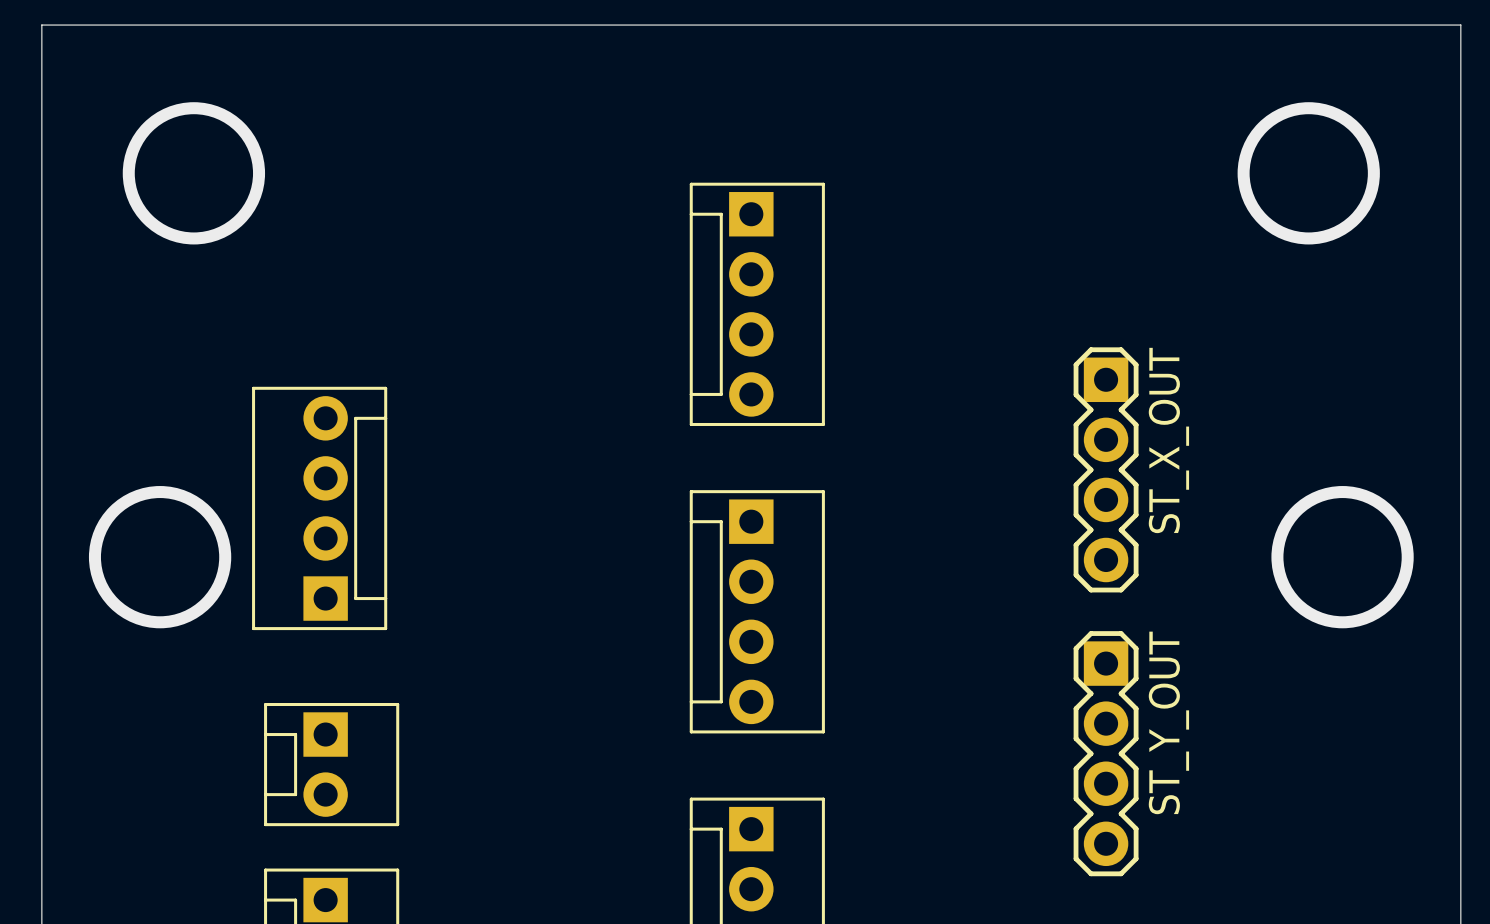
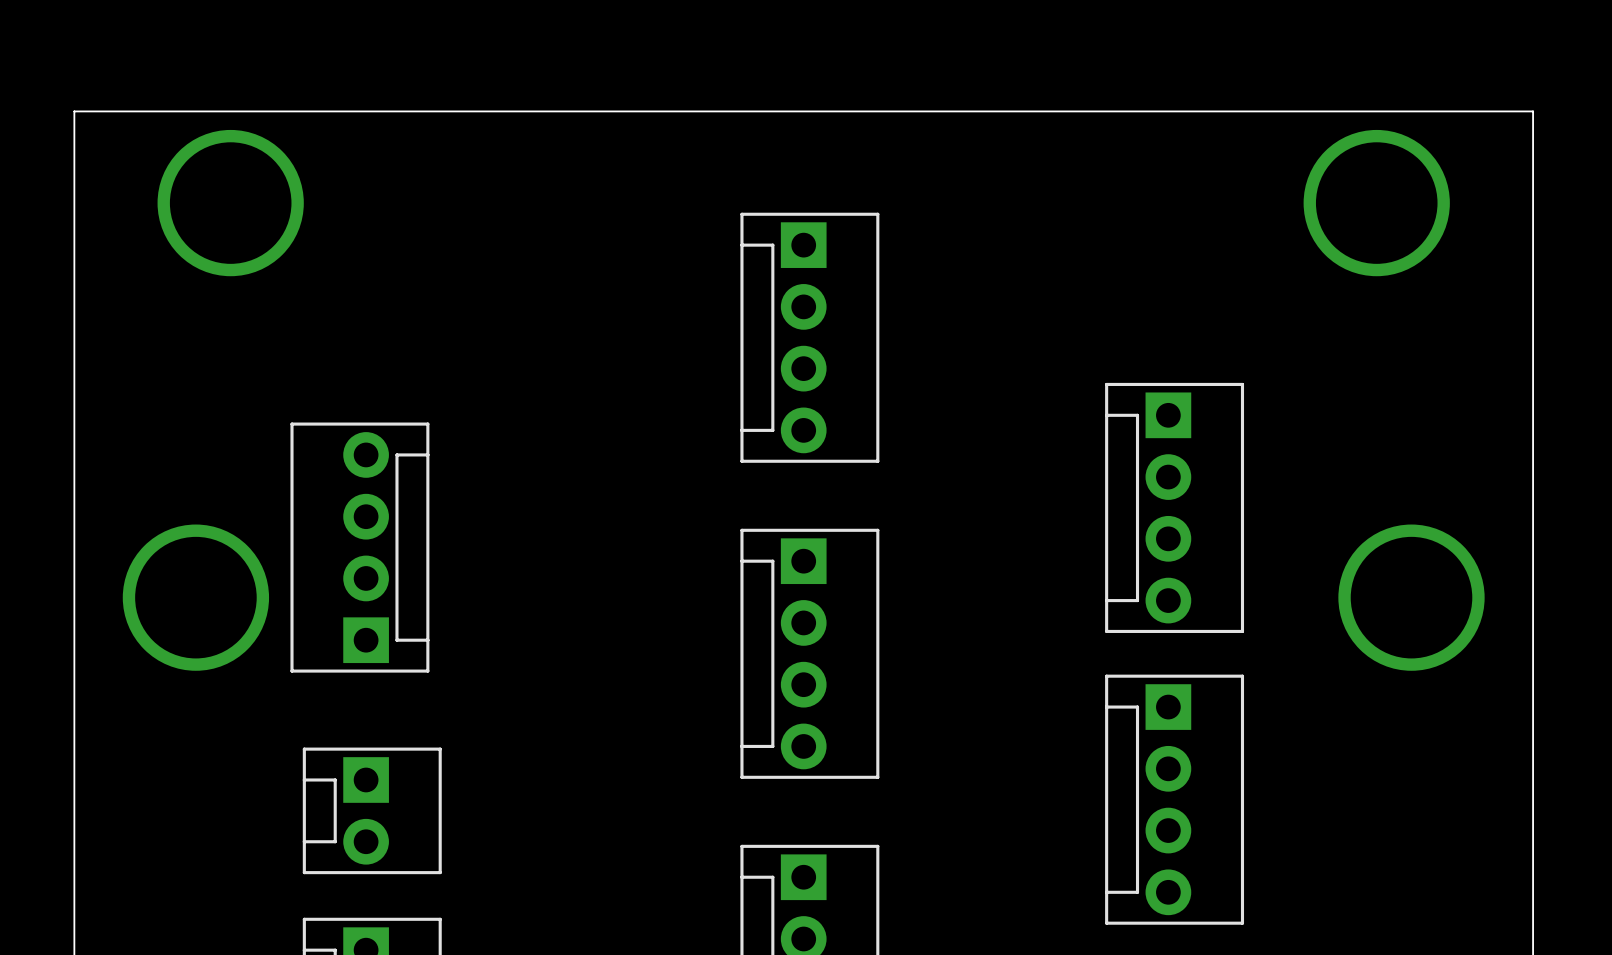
board edge: (41, 84) (41, 25) (1460, 25) (1460, 84) -> (74, 111) (1533, 111)
ST_X_OUT: (1106, 469) -> none
part: none -> (1174, 507)
ST_Y_OUT: (1106, 753) -> none
part: none -> (1174, 799)

